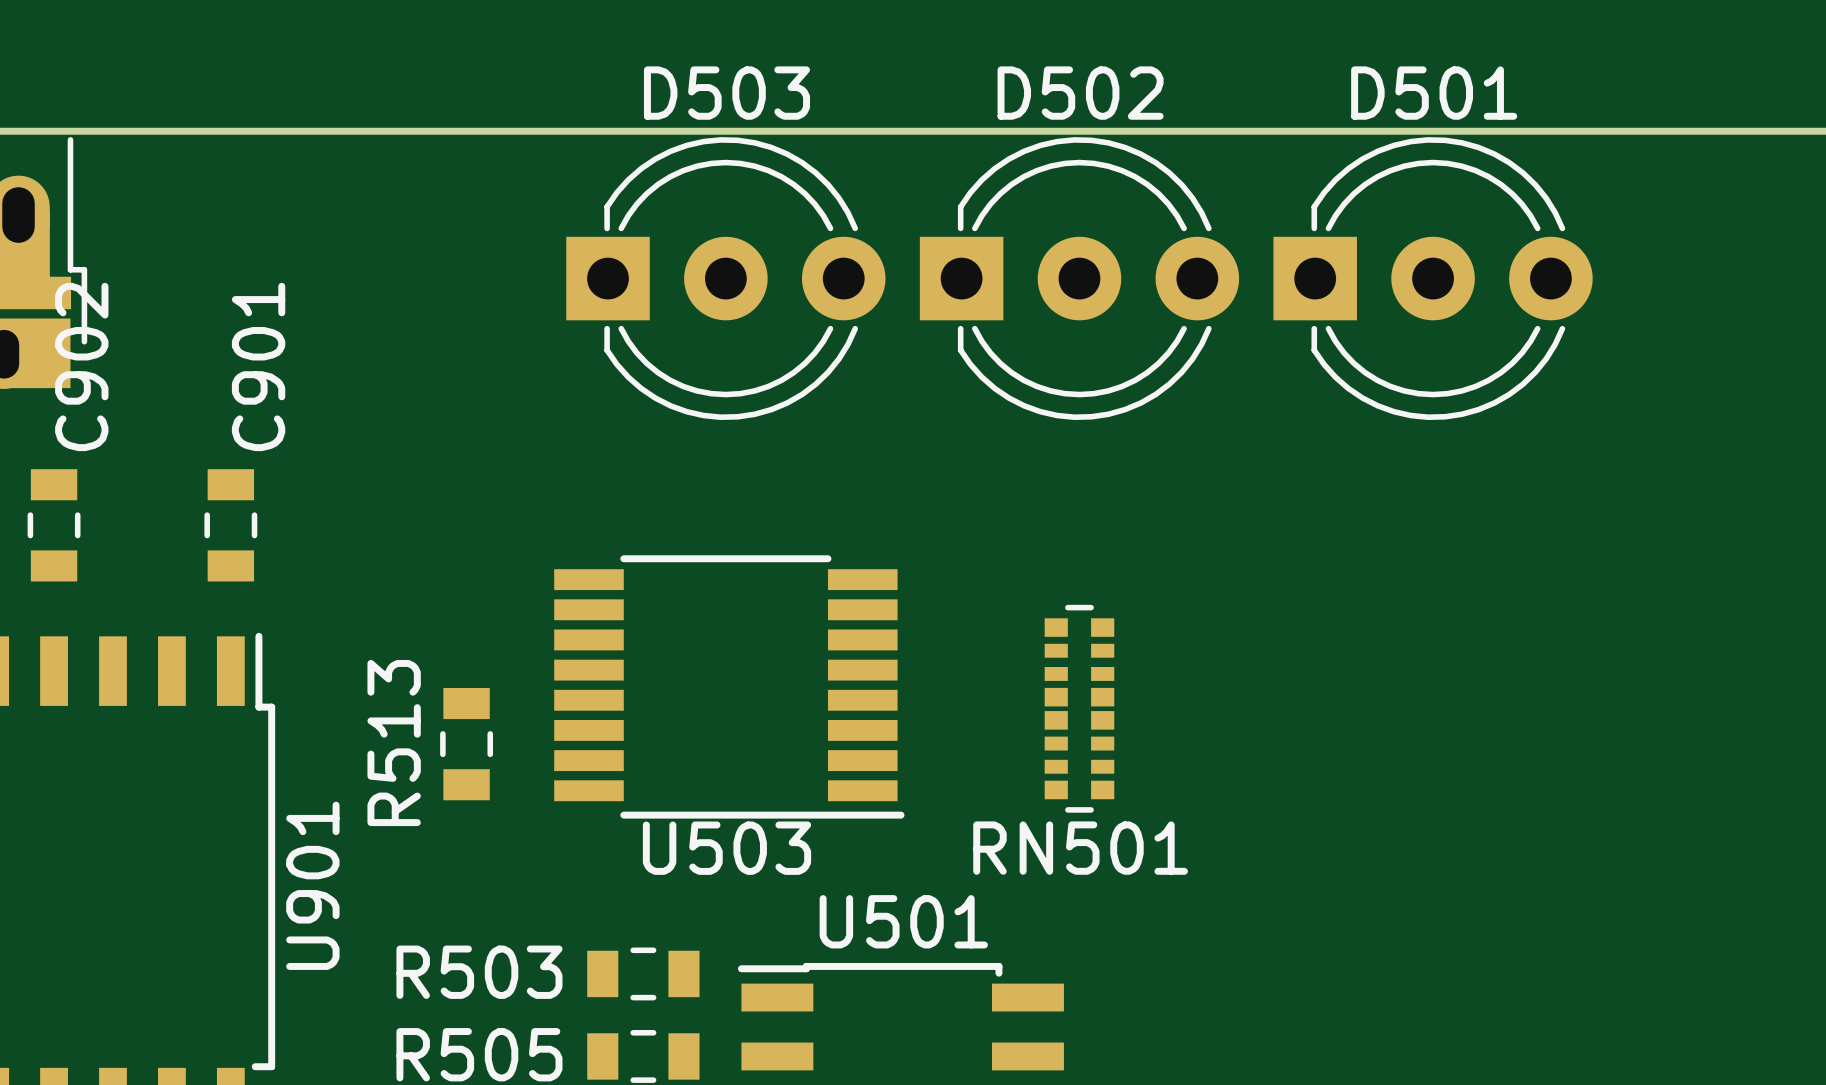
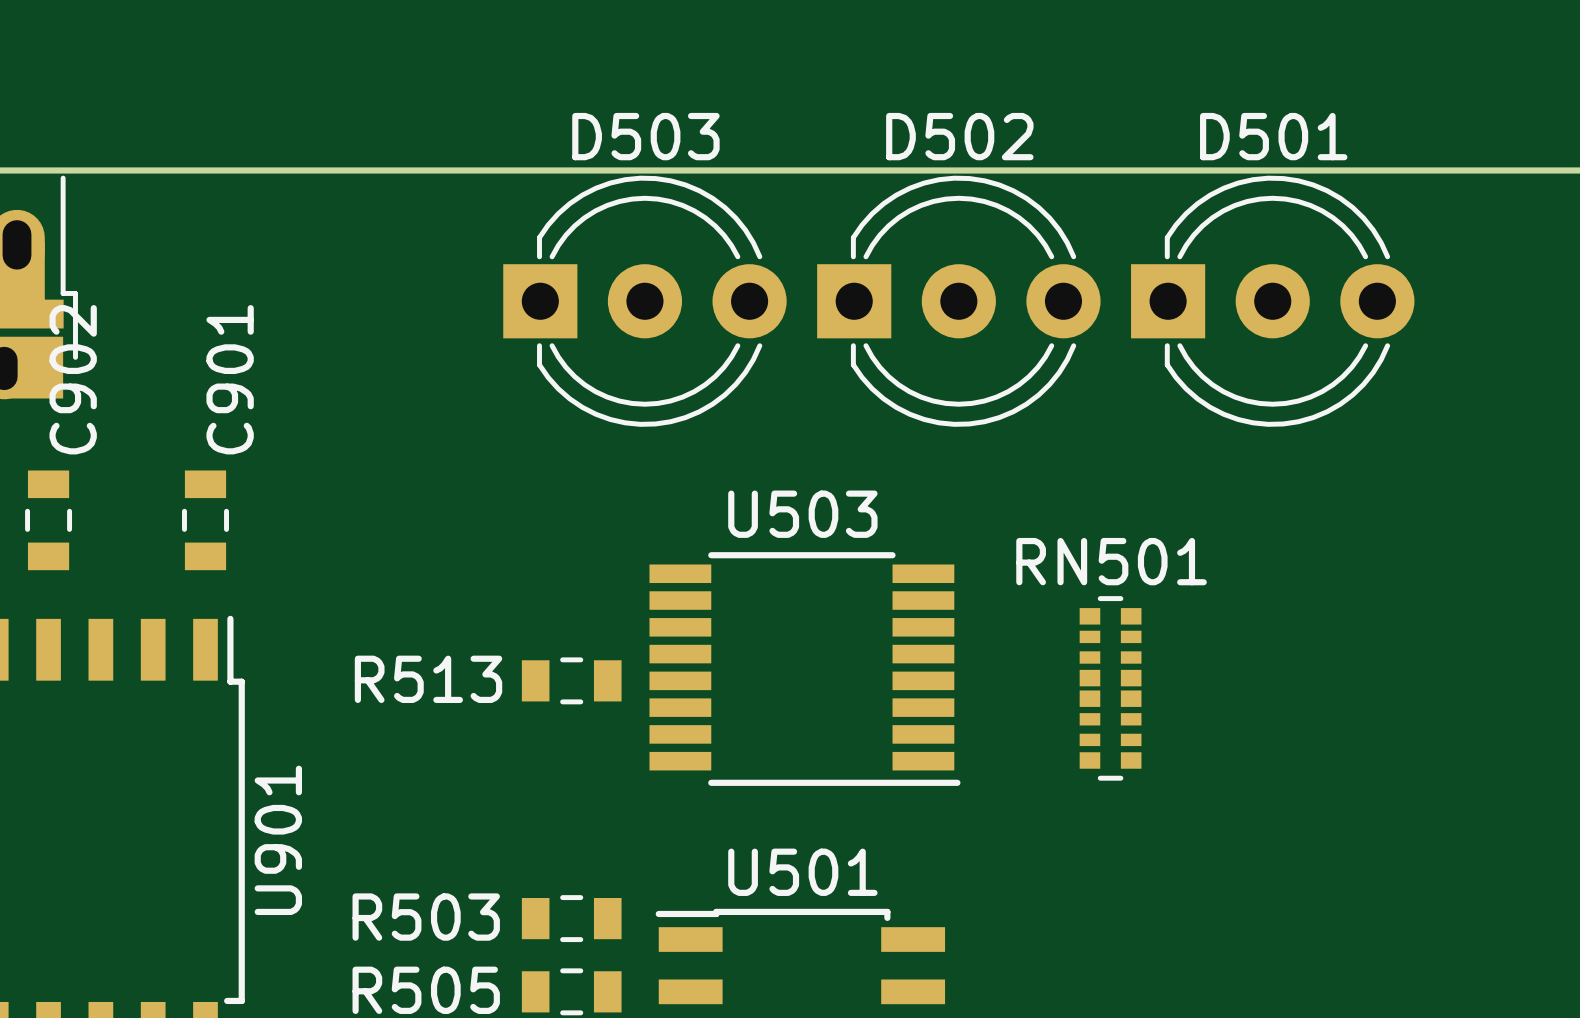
U503 position: (729, 686) -> (804, 669)
RN501 position: (1079, 708) -> (1110, 688)
R513 rotation: 0° (466, 744) -> 90° clockwise (571, 680)
R513 position: (466, 744) -> (571, 680)
U503 name position: U503 (726, 848) -> U503 (802, 514)
RN501 name position: RN501 (1080, 848) -> RN501 (1111, 561)

